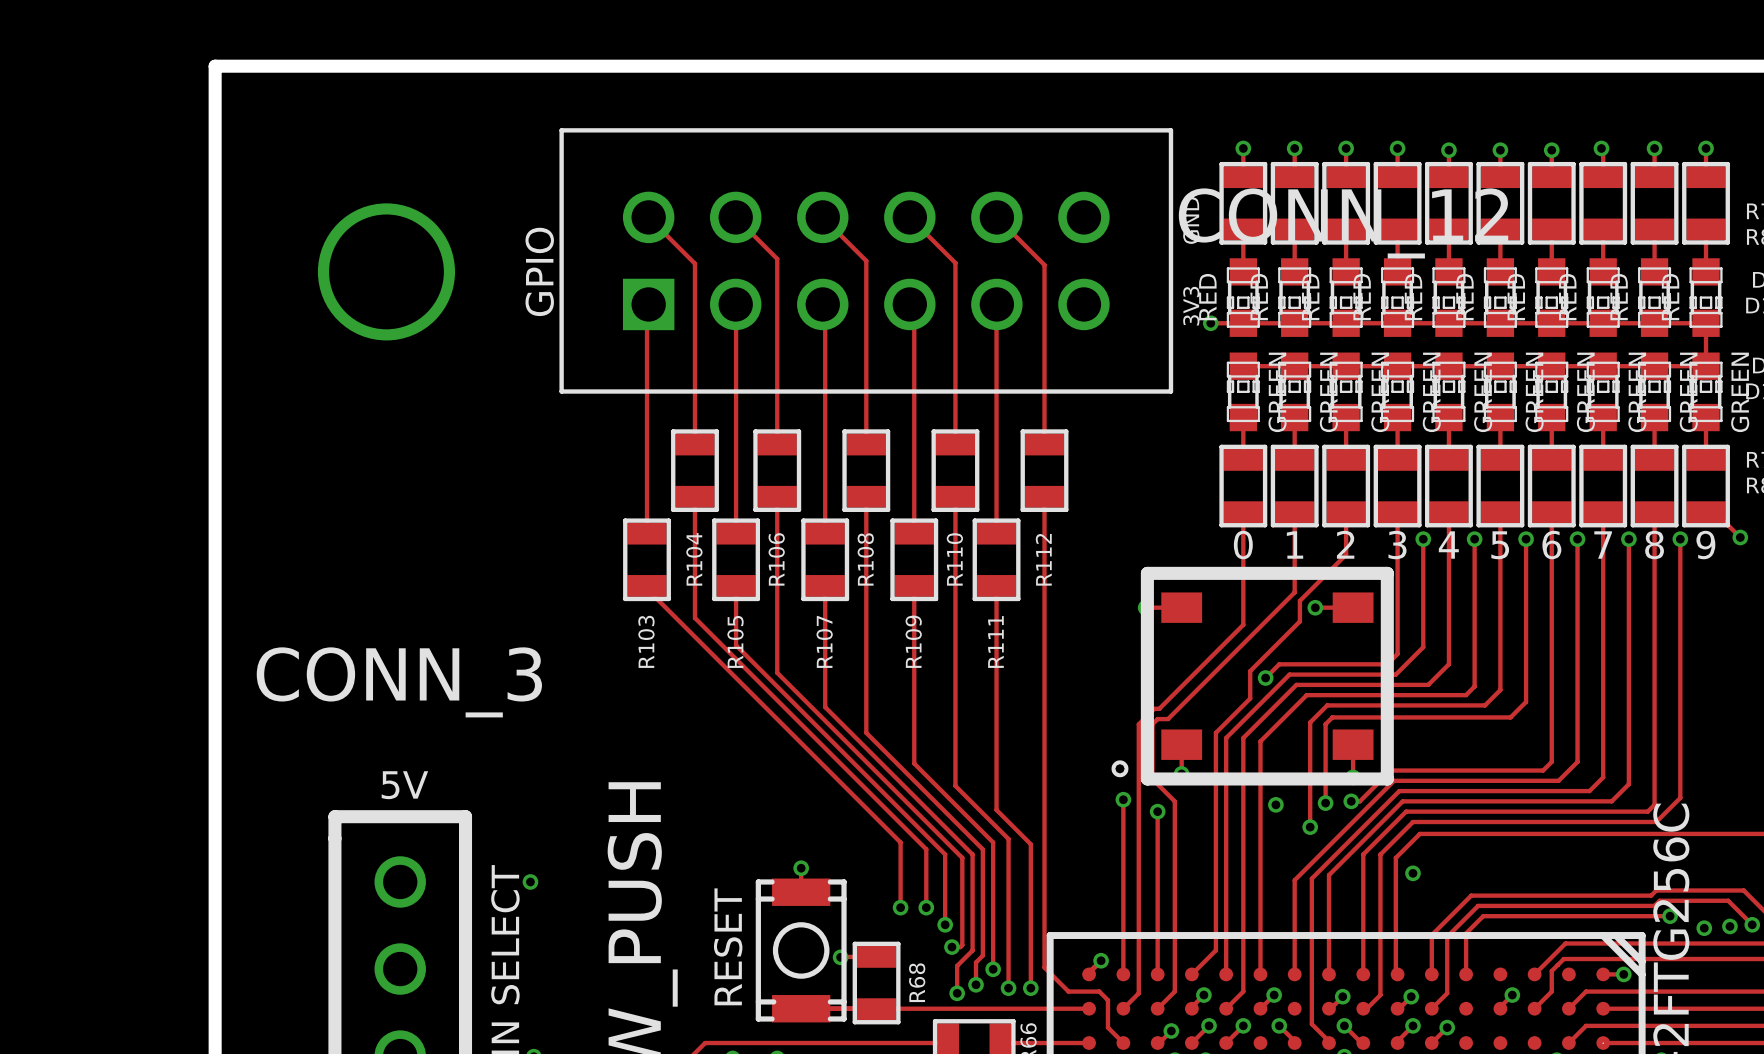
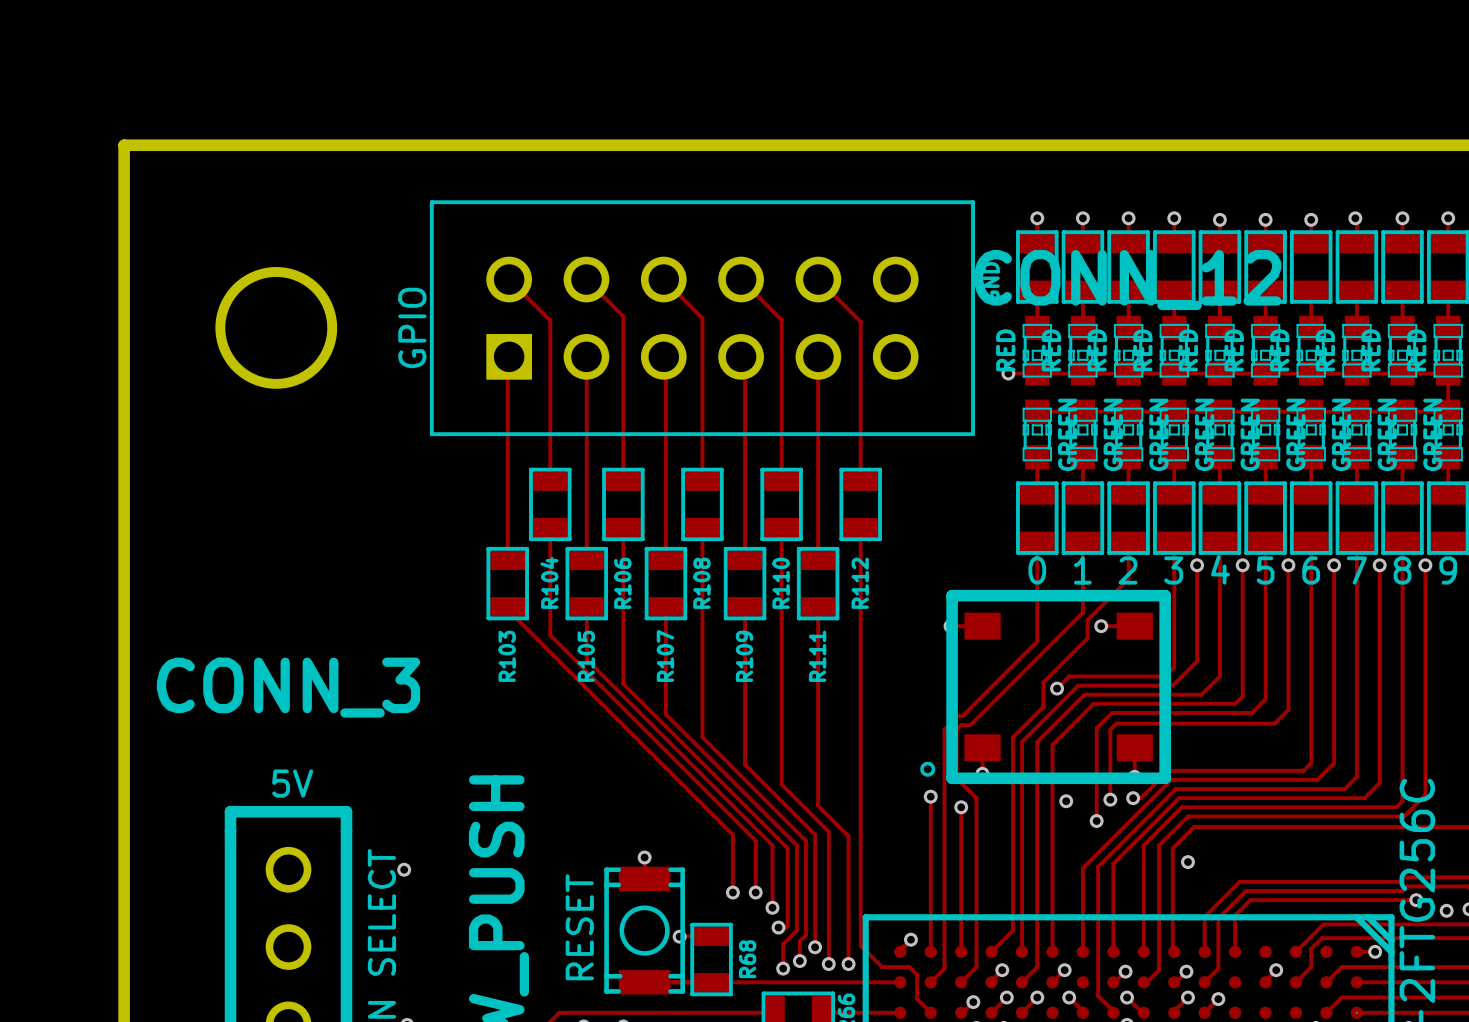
text: 3V3 (1191, 306) -> none

